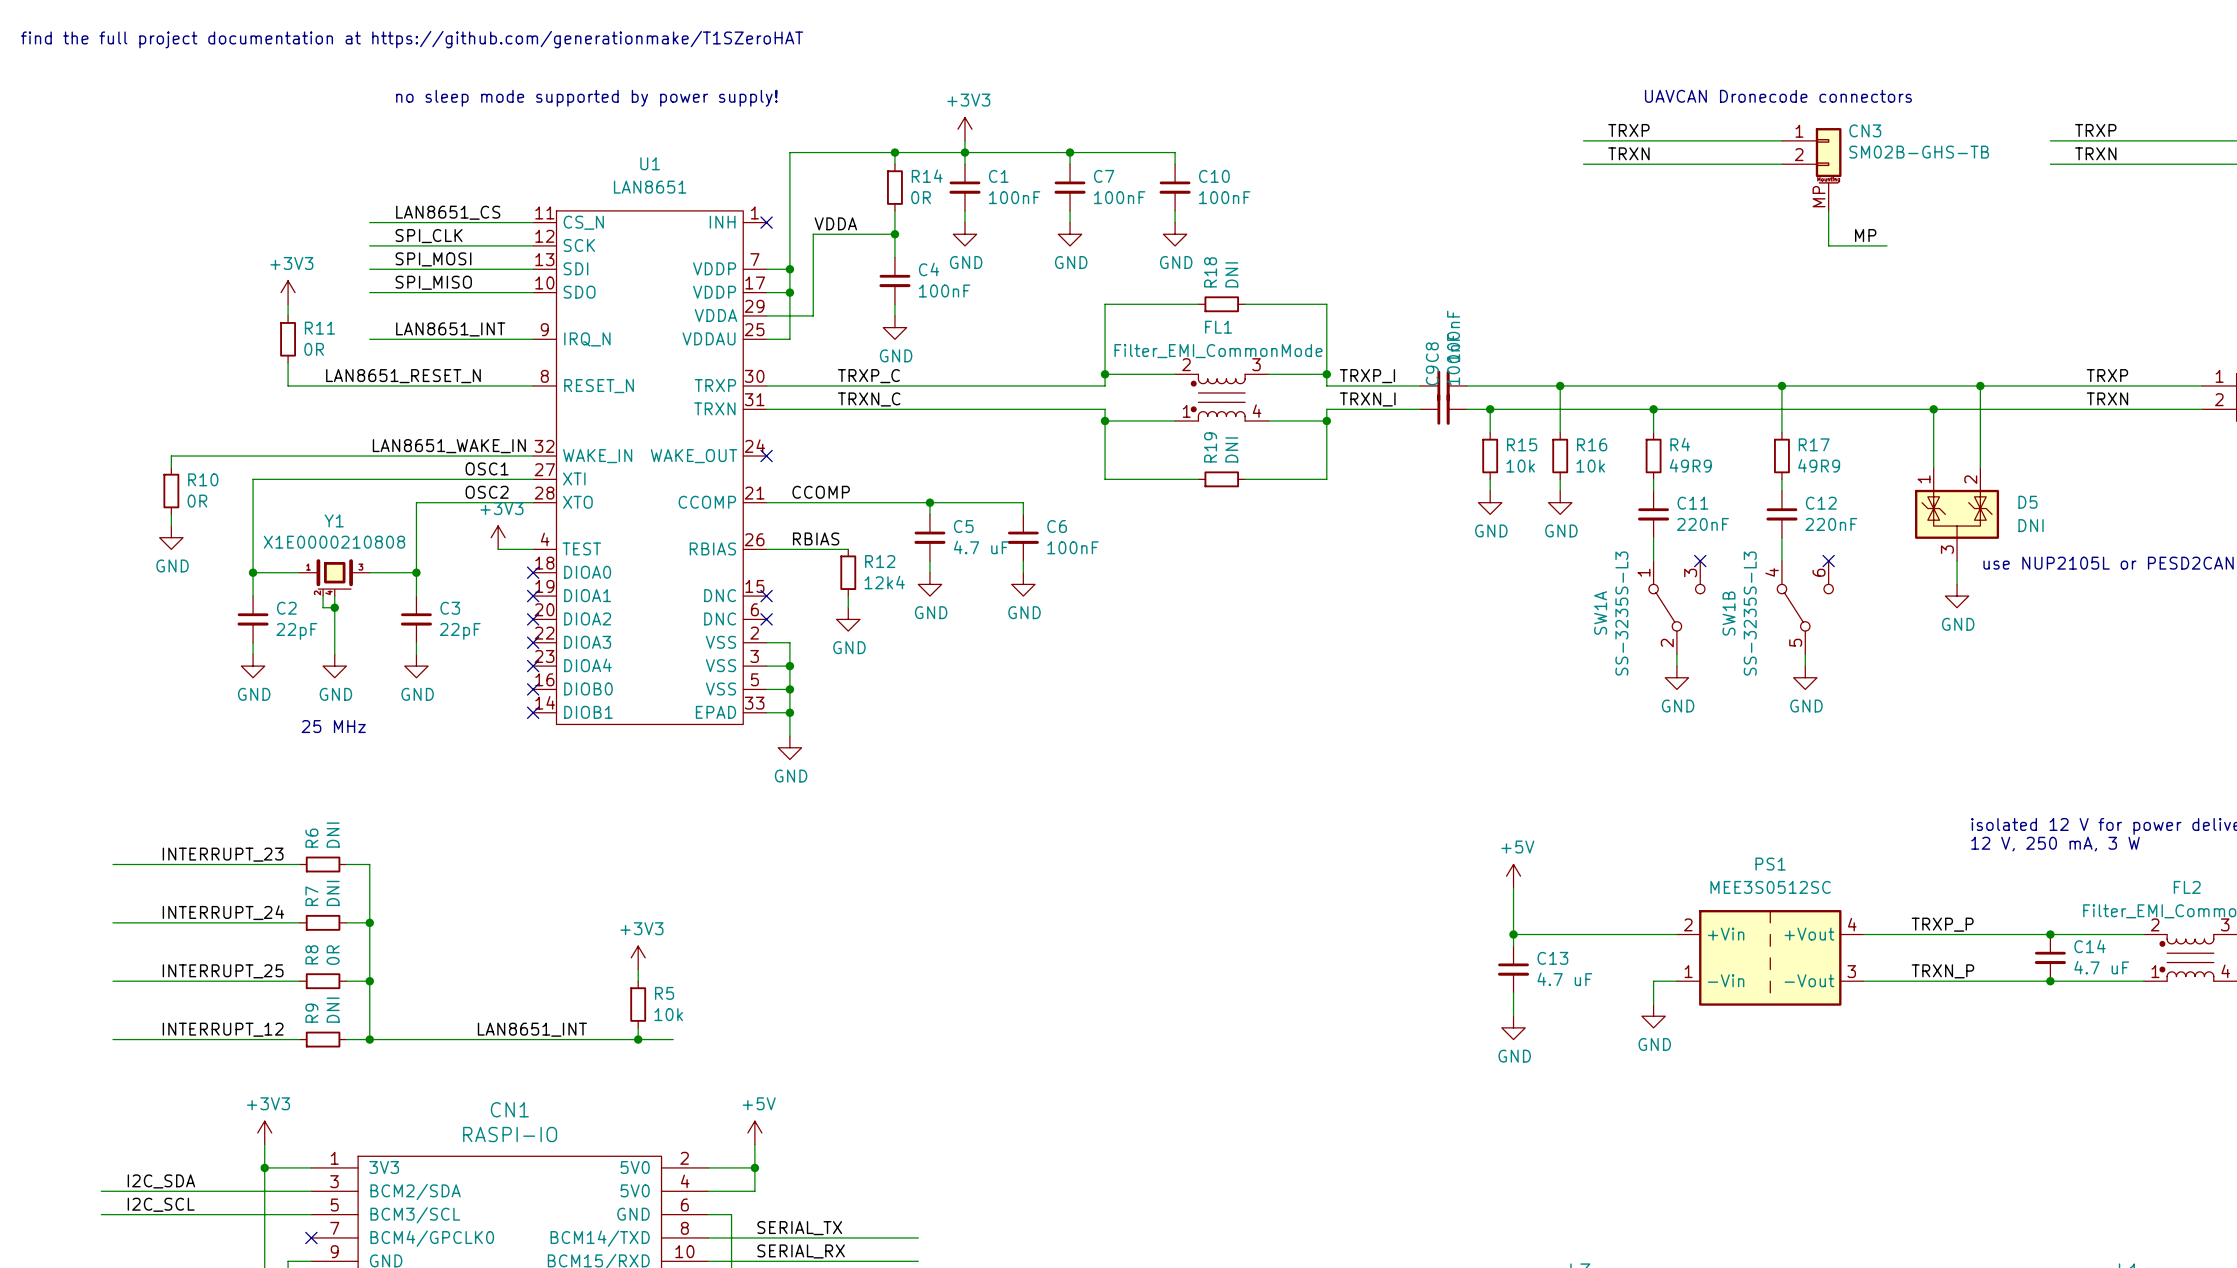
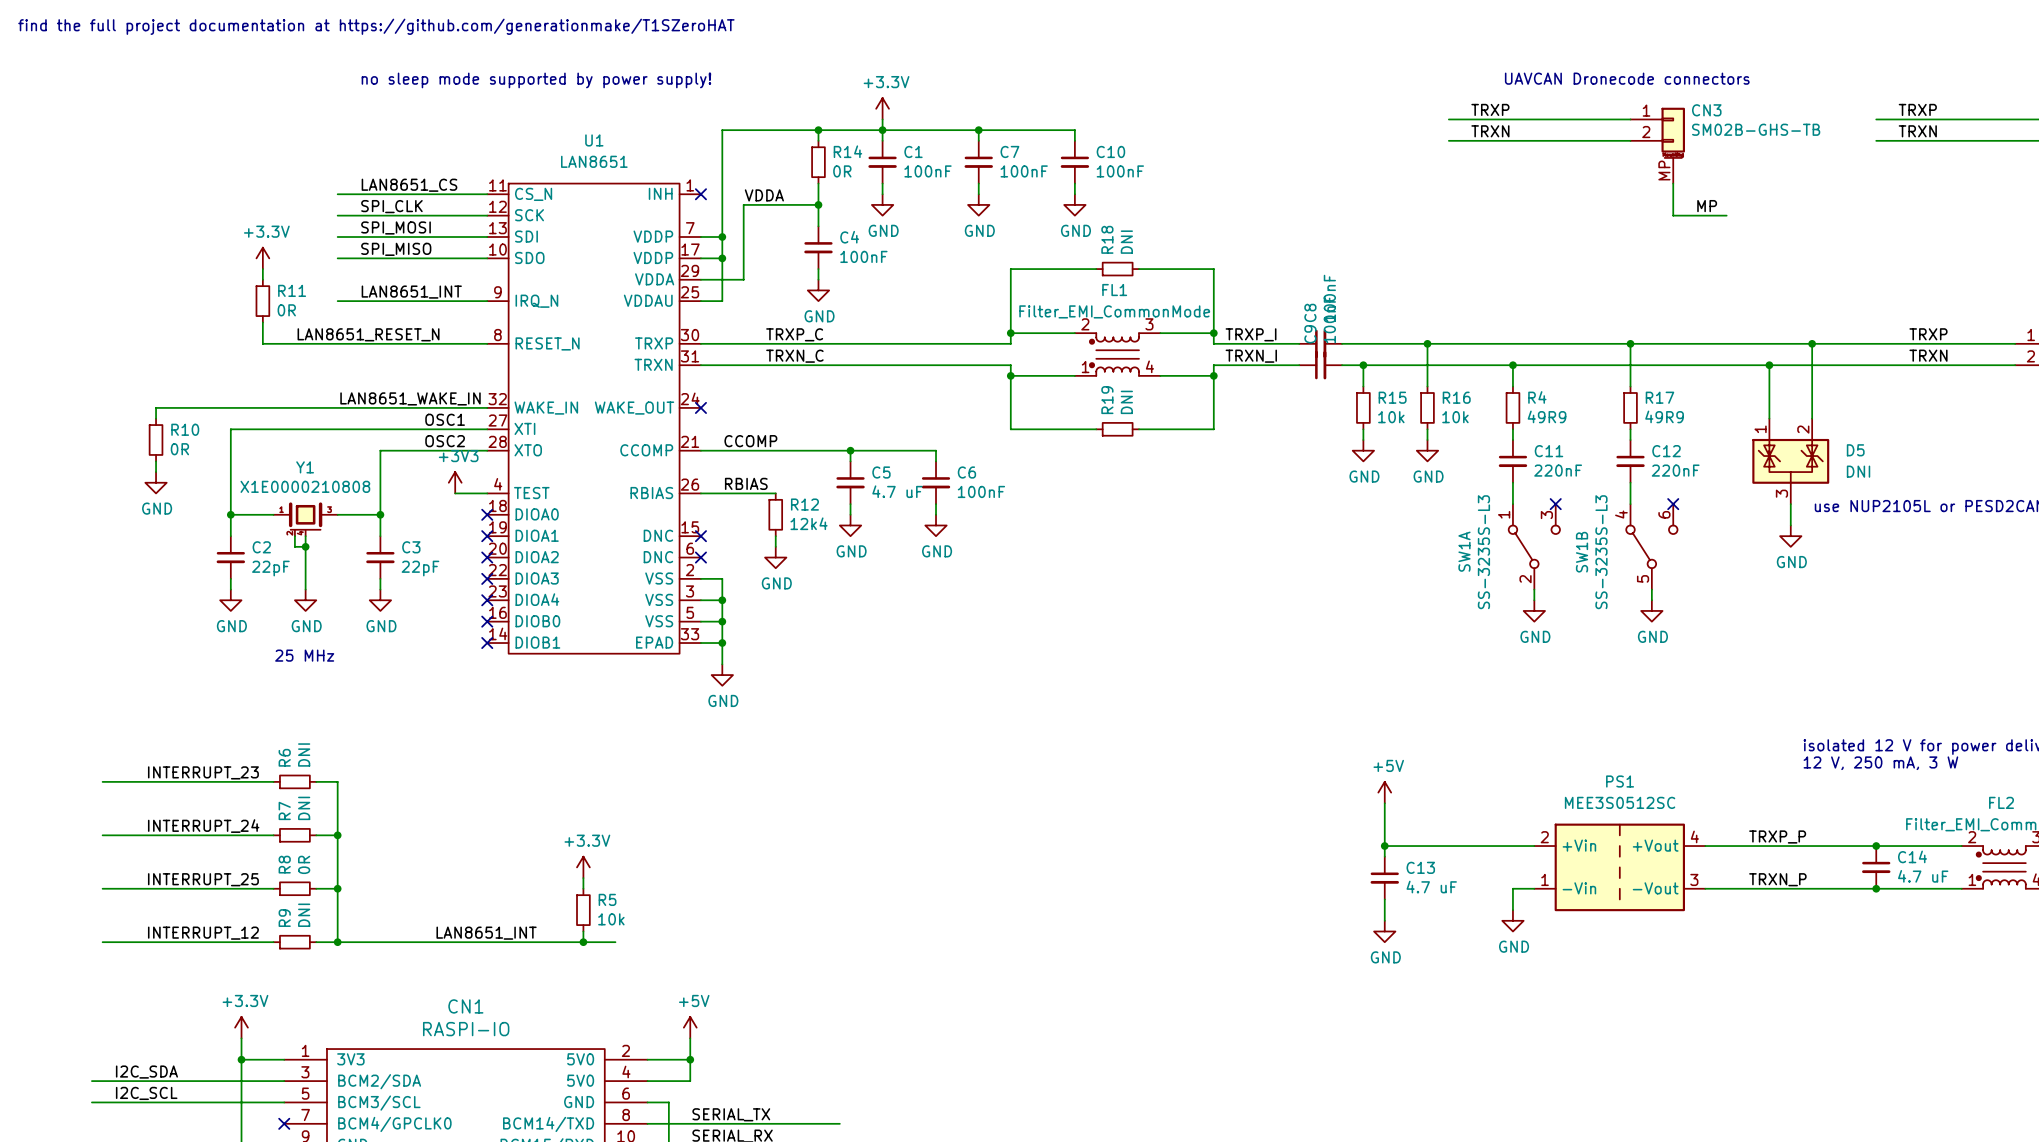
power symbol: +3V3 (964, 129) -> +3.3V (882, 108)
power symbol: +3V3 (288, 292) -> +3.3V (262, 258)
power symbol: +3V3 (638, 957) -> +3.3V (583, 867)
power symbol: +3V3 (264, 1132) -> +3.3V (241, 1027)

